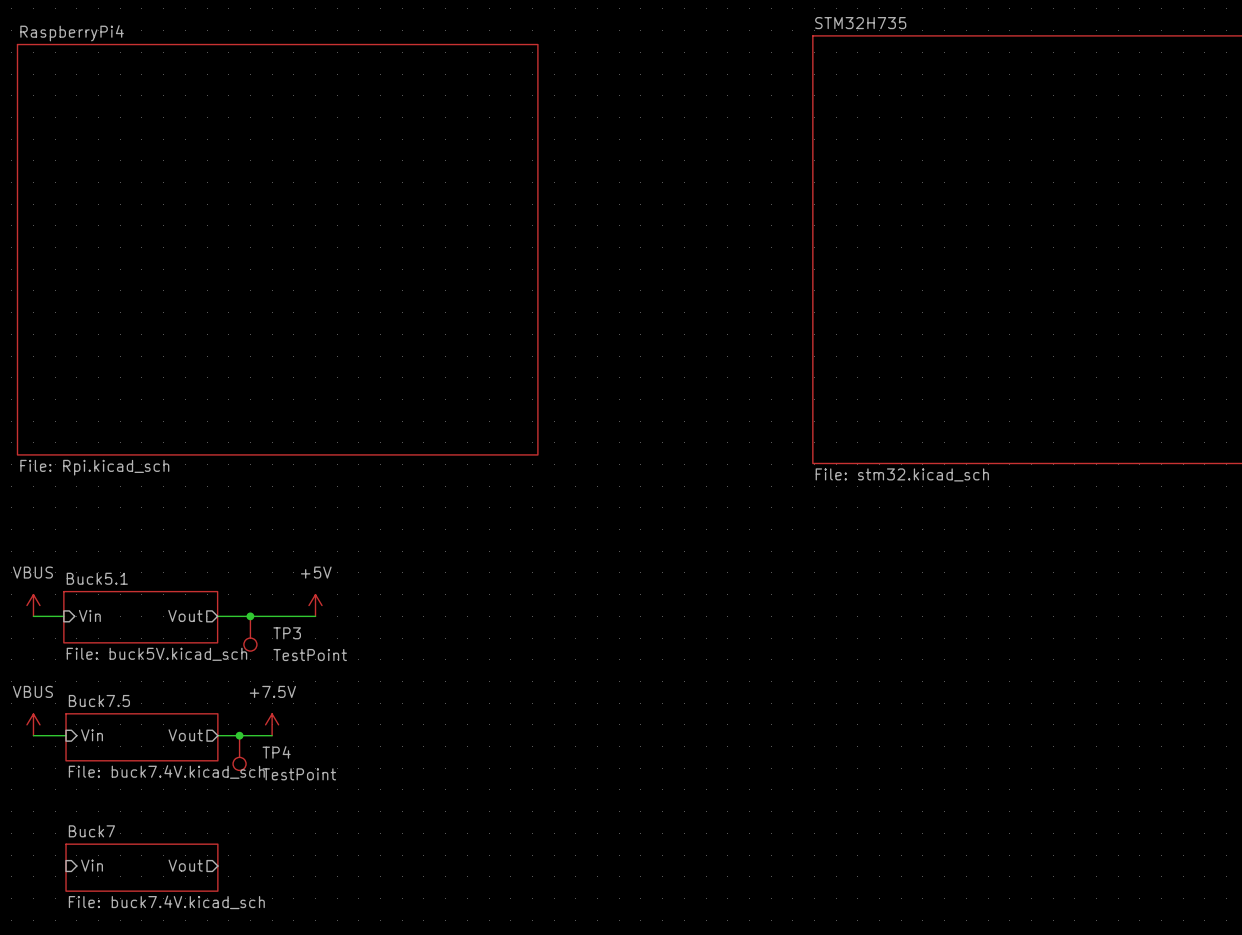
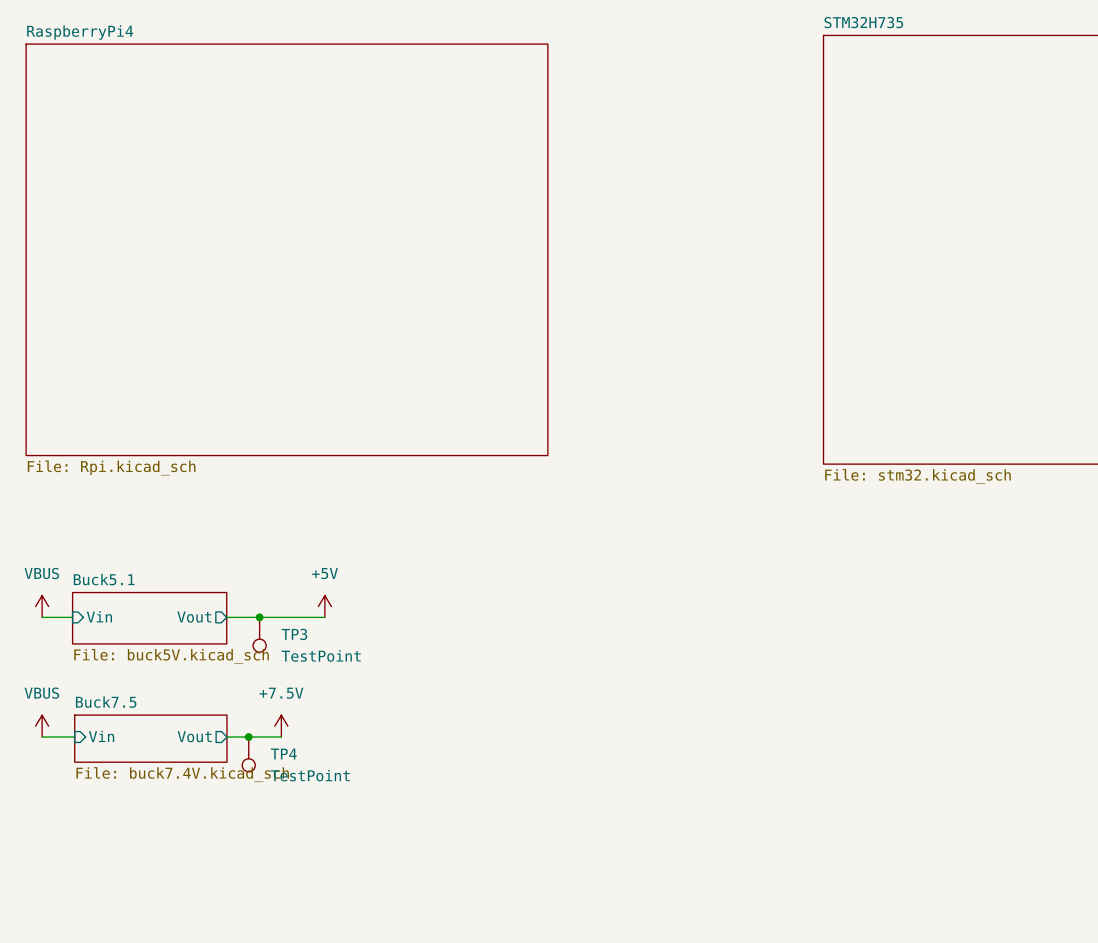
sheet pin: Vin (92, 865) -> none
sheet pin: Vout (185, 865) -> none
sheet Buck7: File: buck7.4V.kicad_sch (141, 867) -> none

